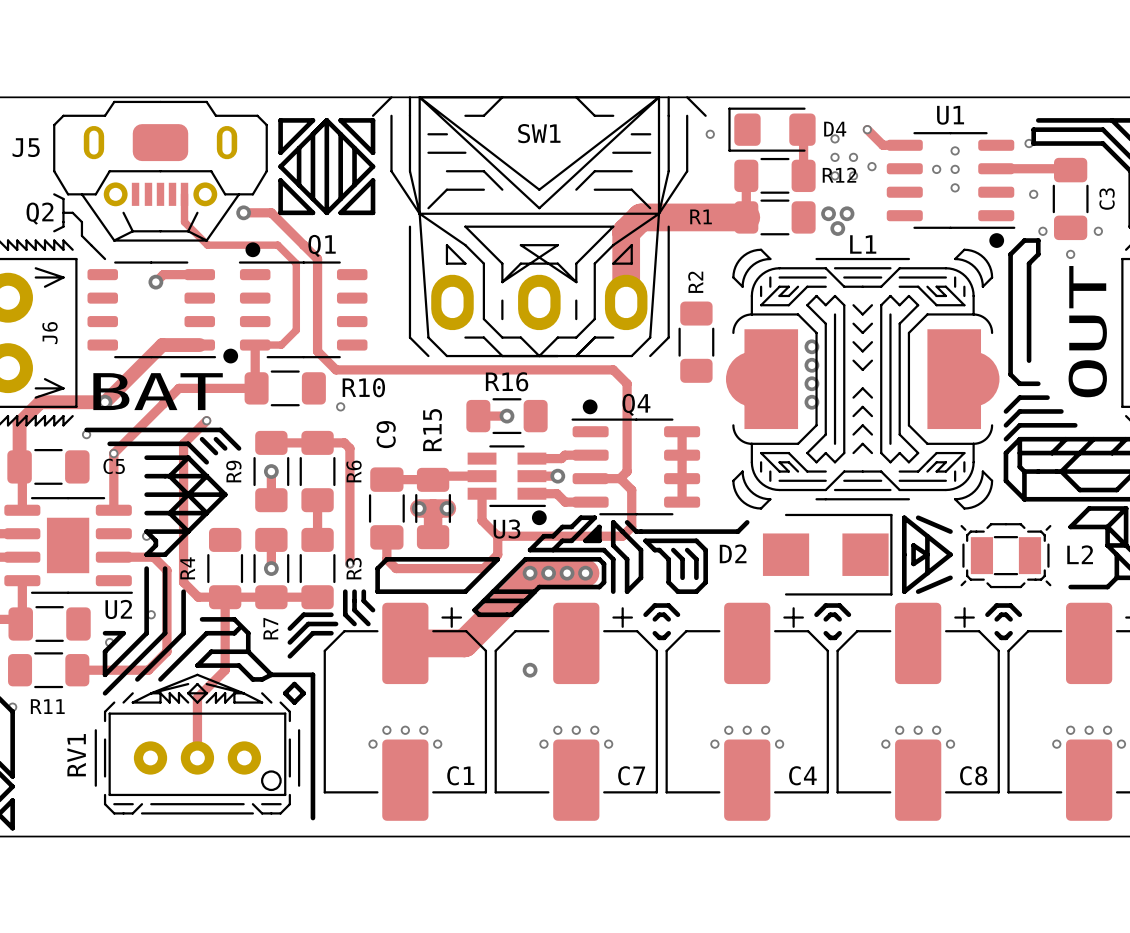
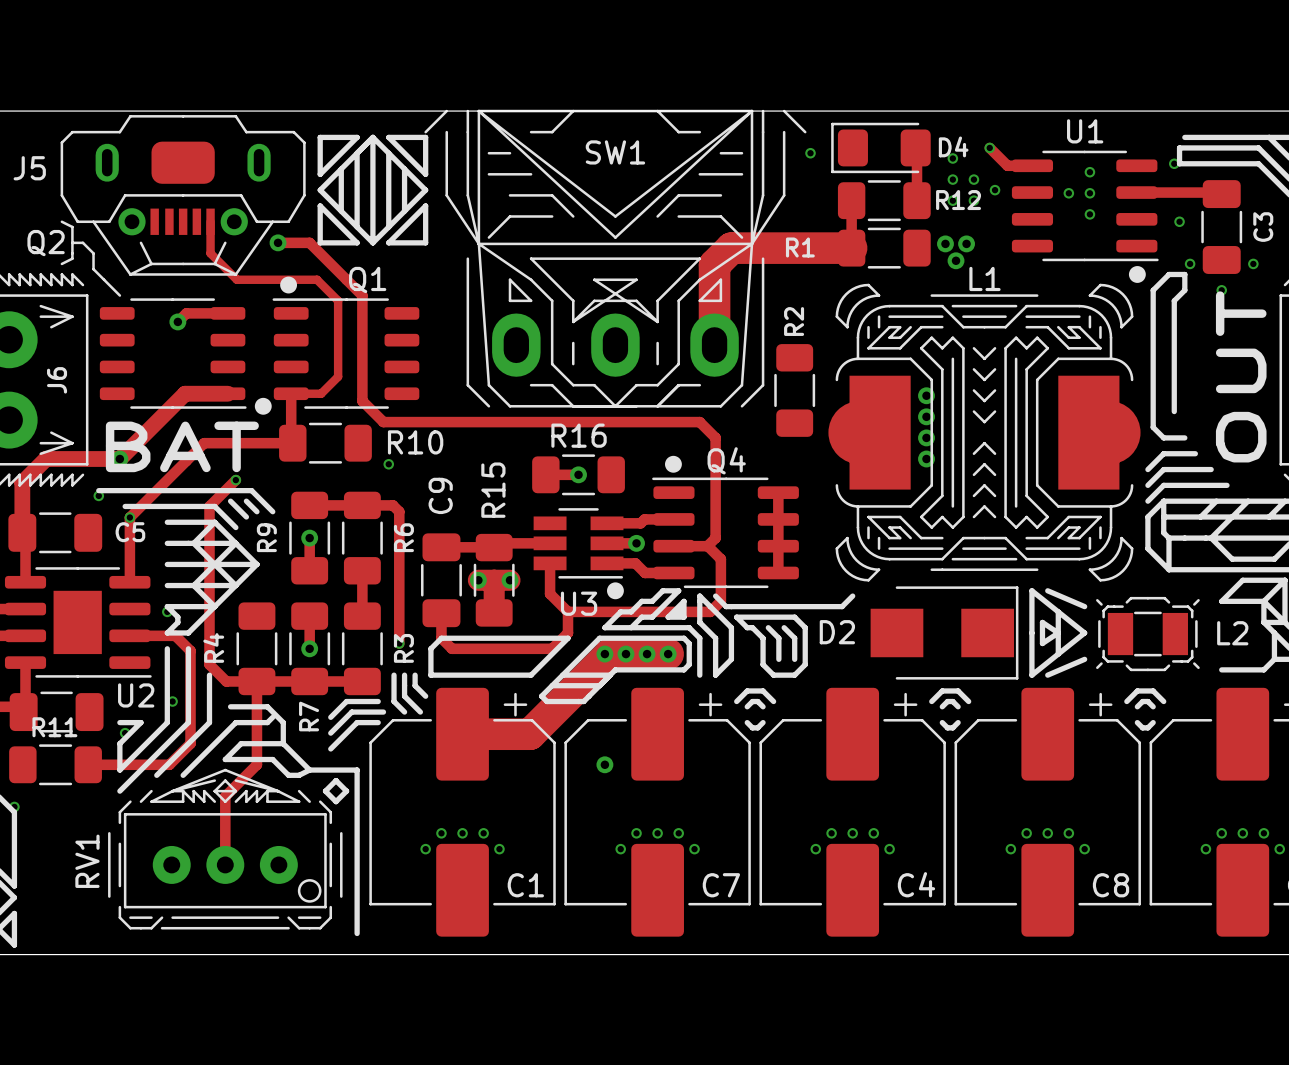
R11 name position: R11 (47, 706) -> R11 (54, 727)

